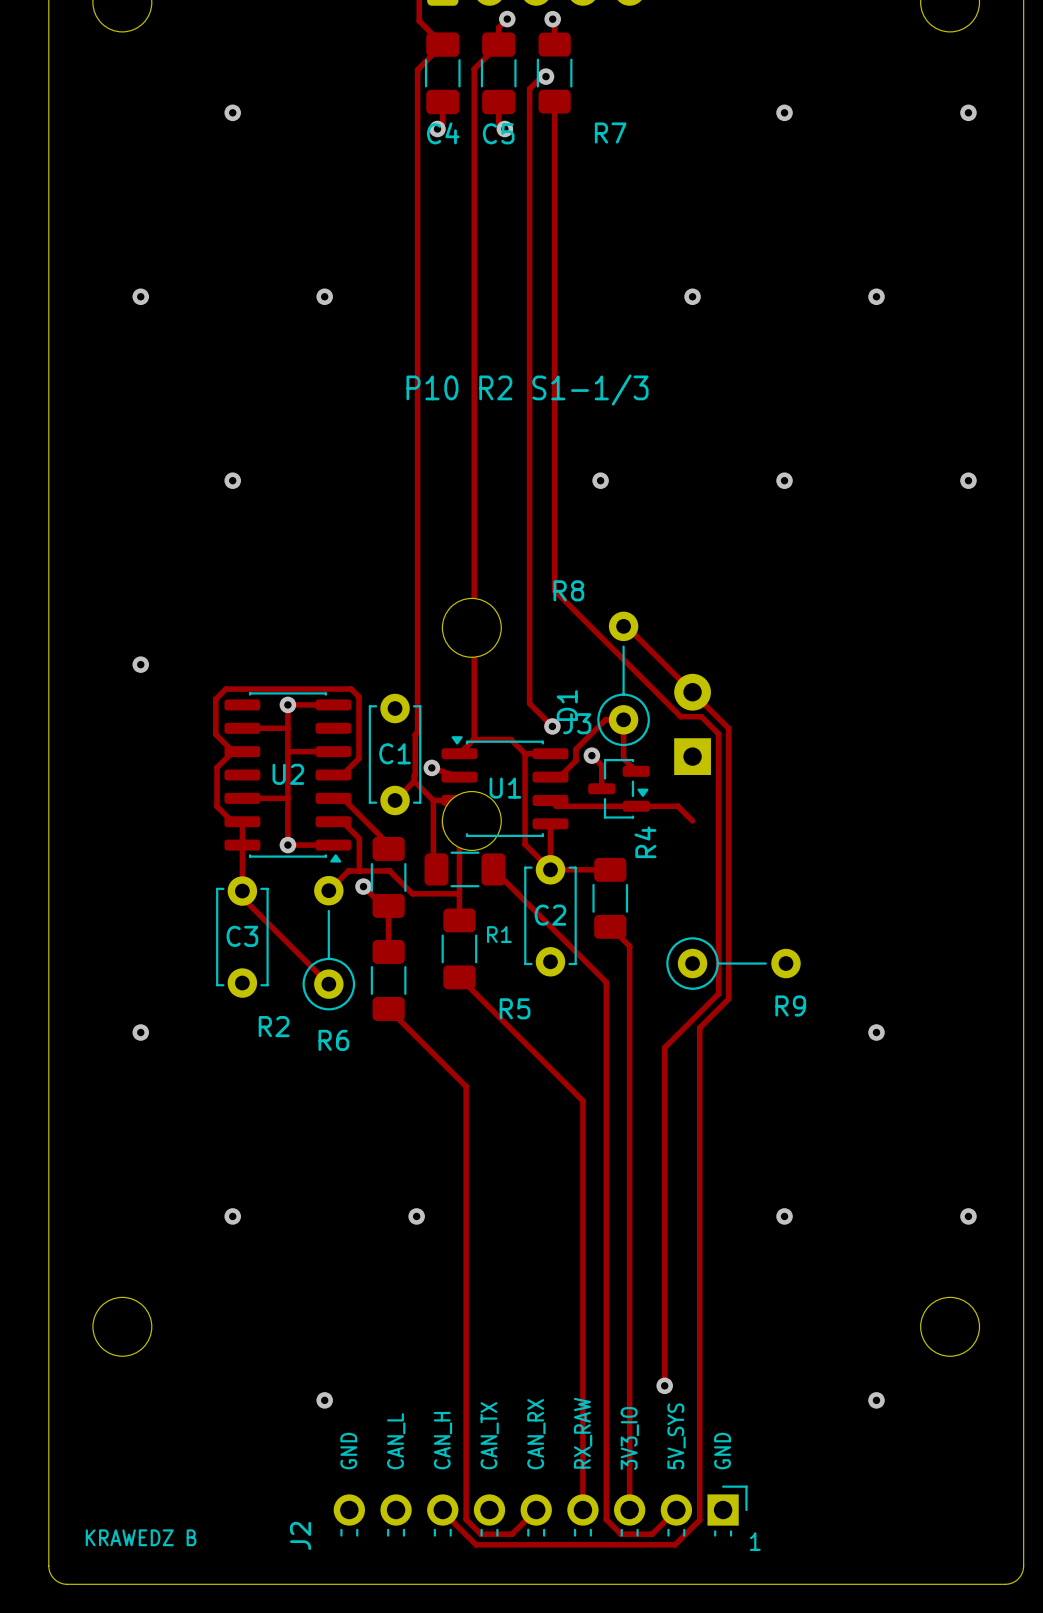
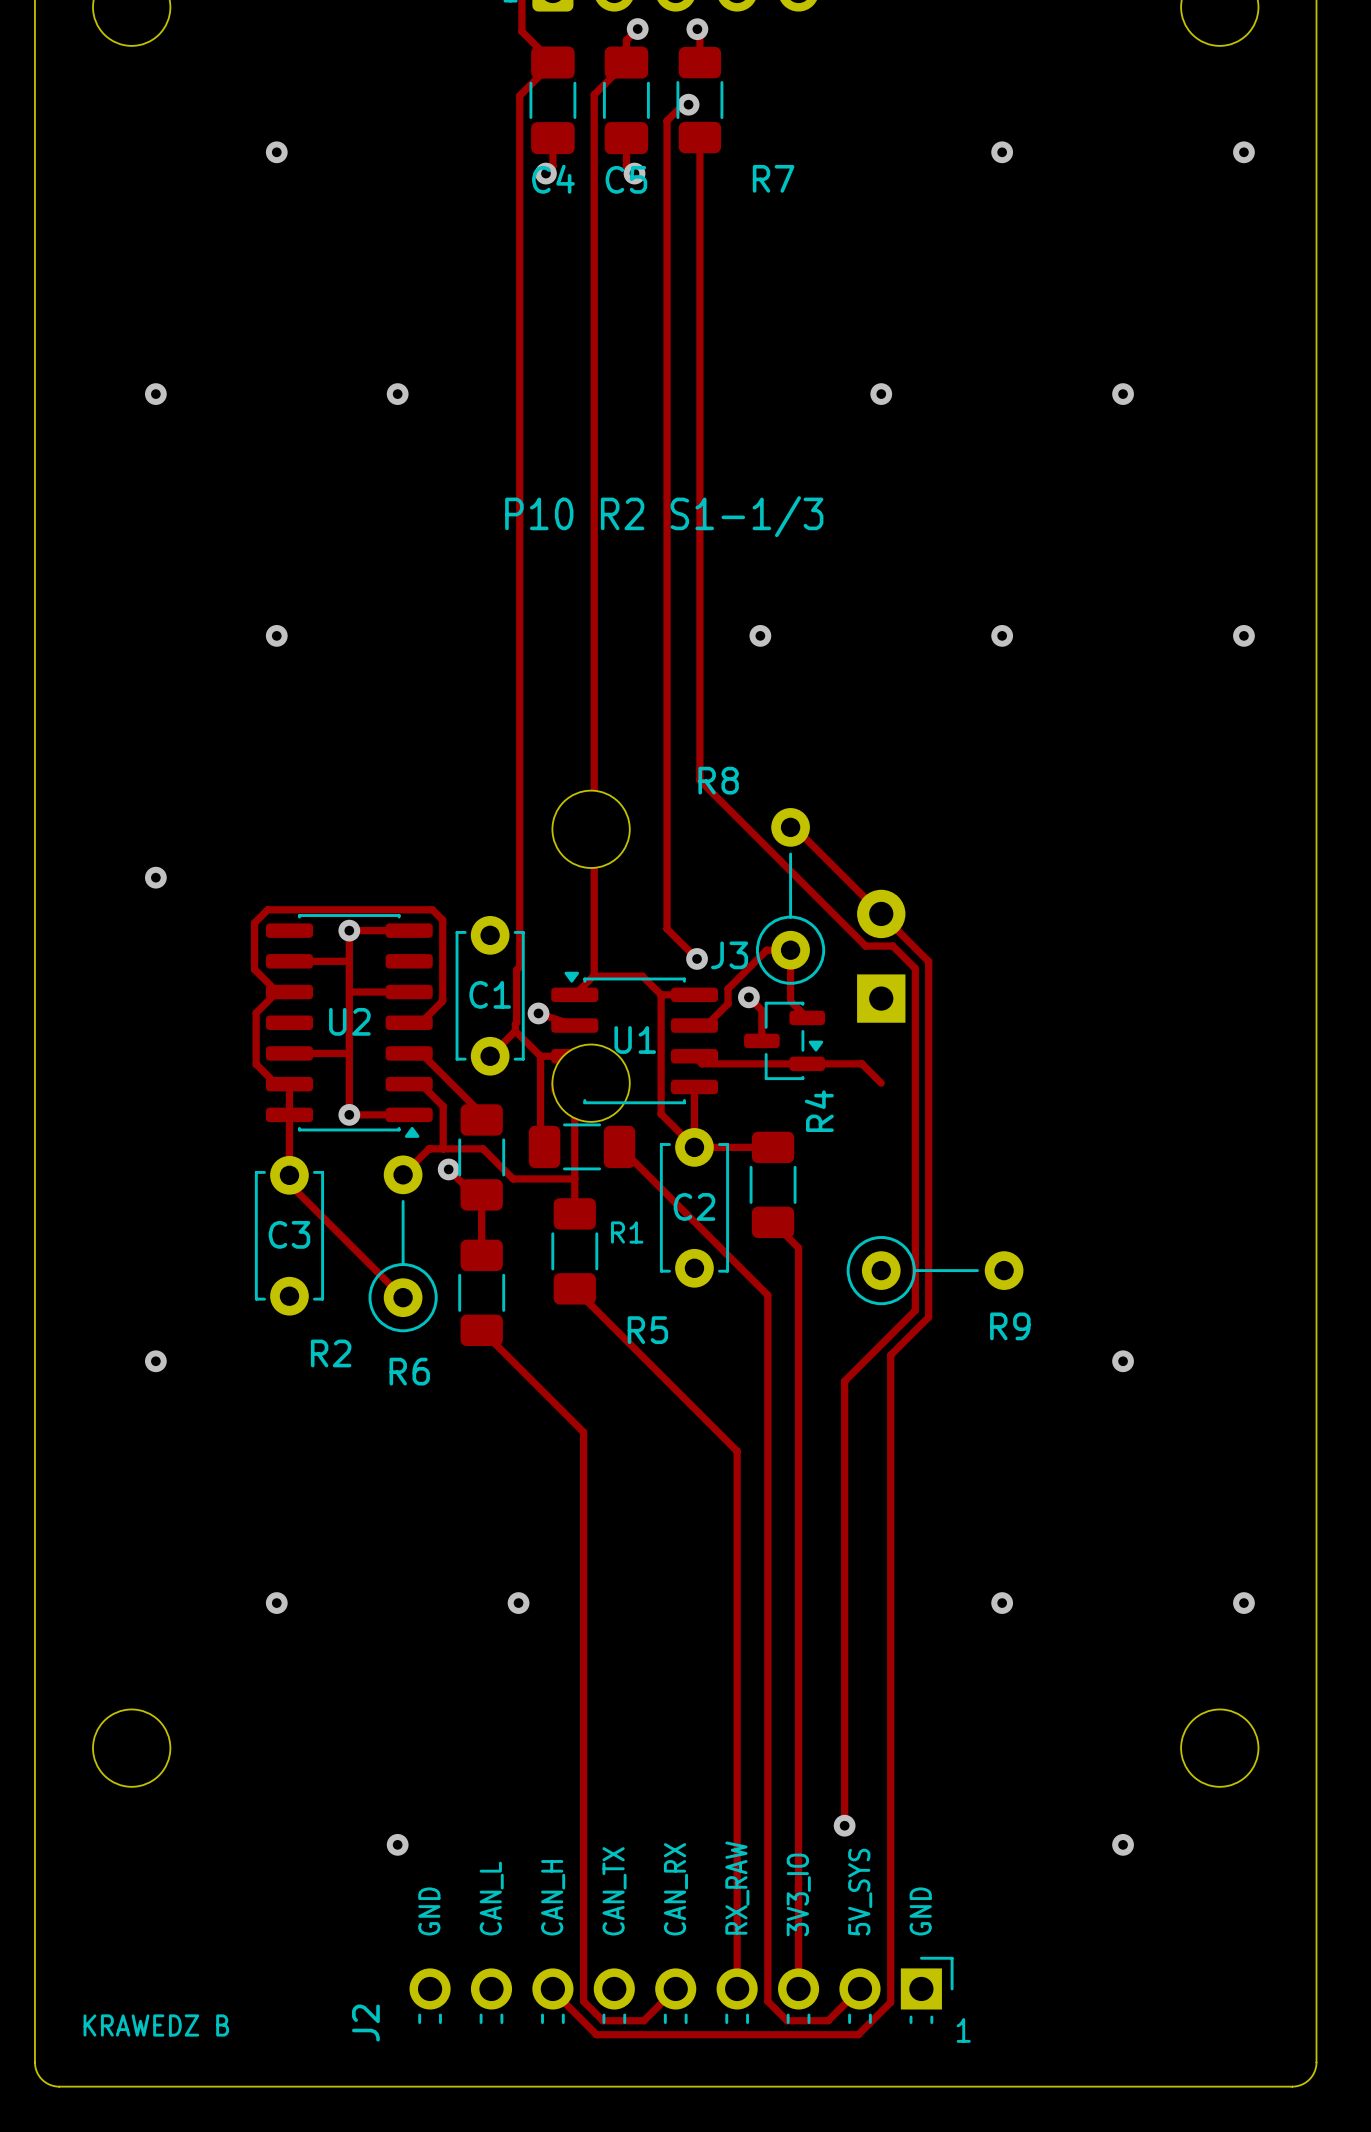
D1 name: D1 (567, 705) -> none

